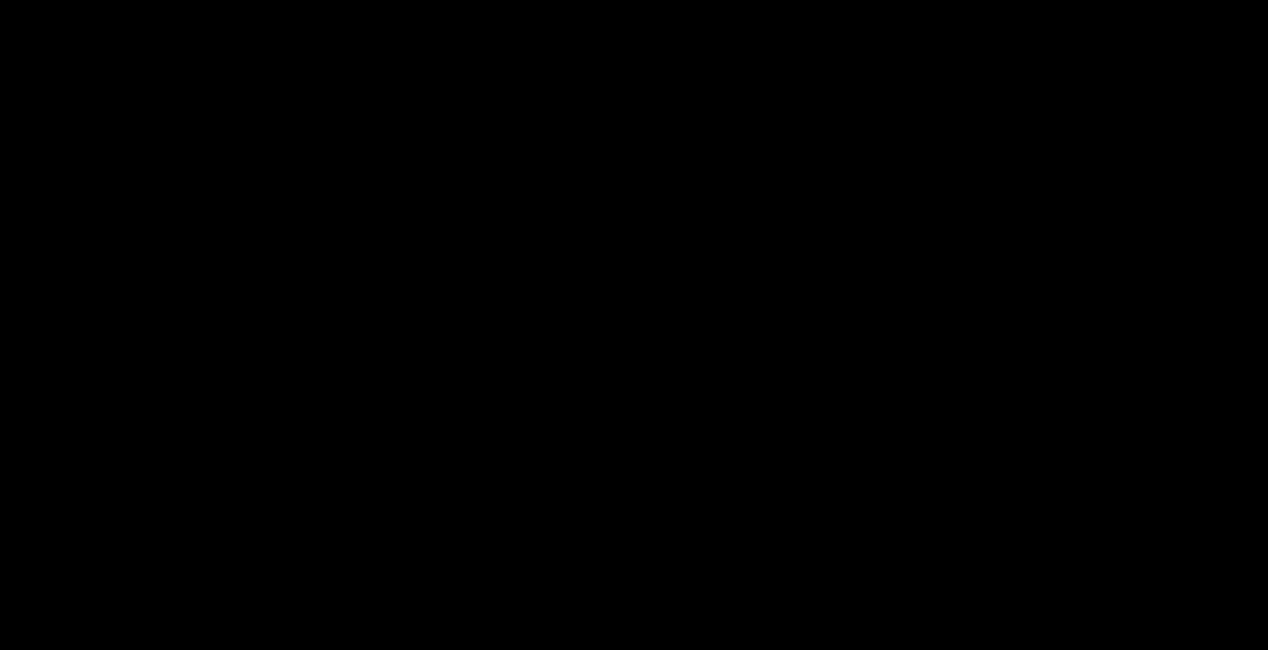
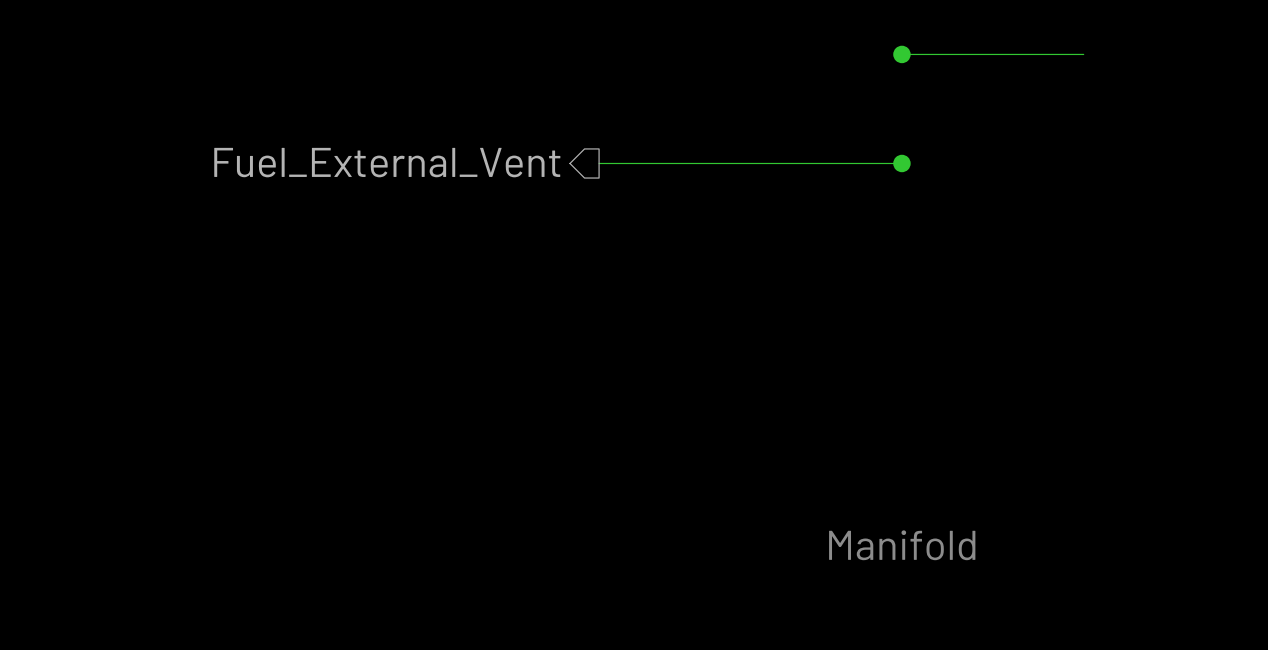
wire: none -> (901, 54) (1083, 54)
junction: none -> (901, 54)
wire: none -> (599, 163) (901, 163)
junction: none -> (901, 163)
hierarchical label: none -> Fuel_External_Vent (387, 162)
text: none -> Manifold (902, 545)

